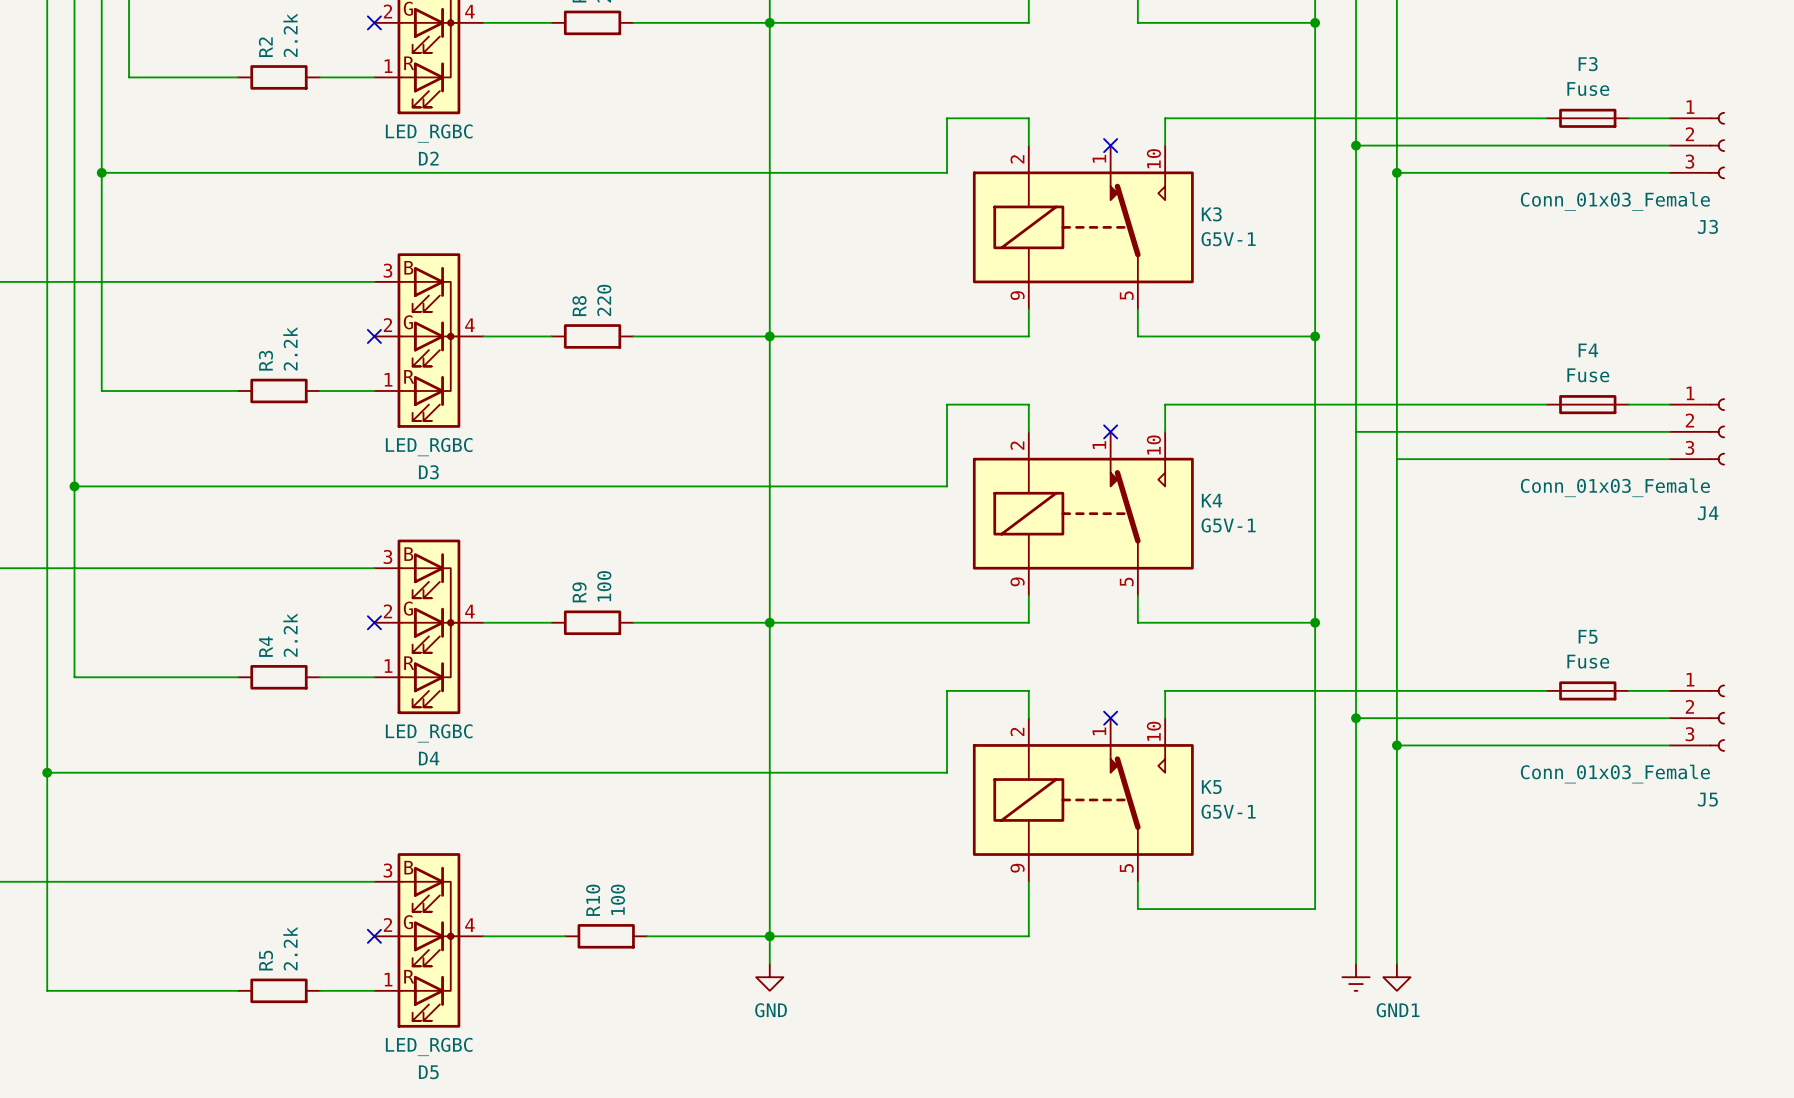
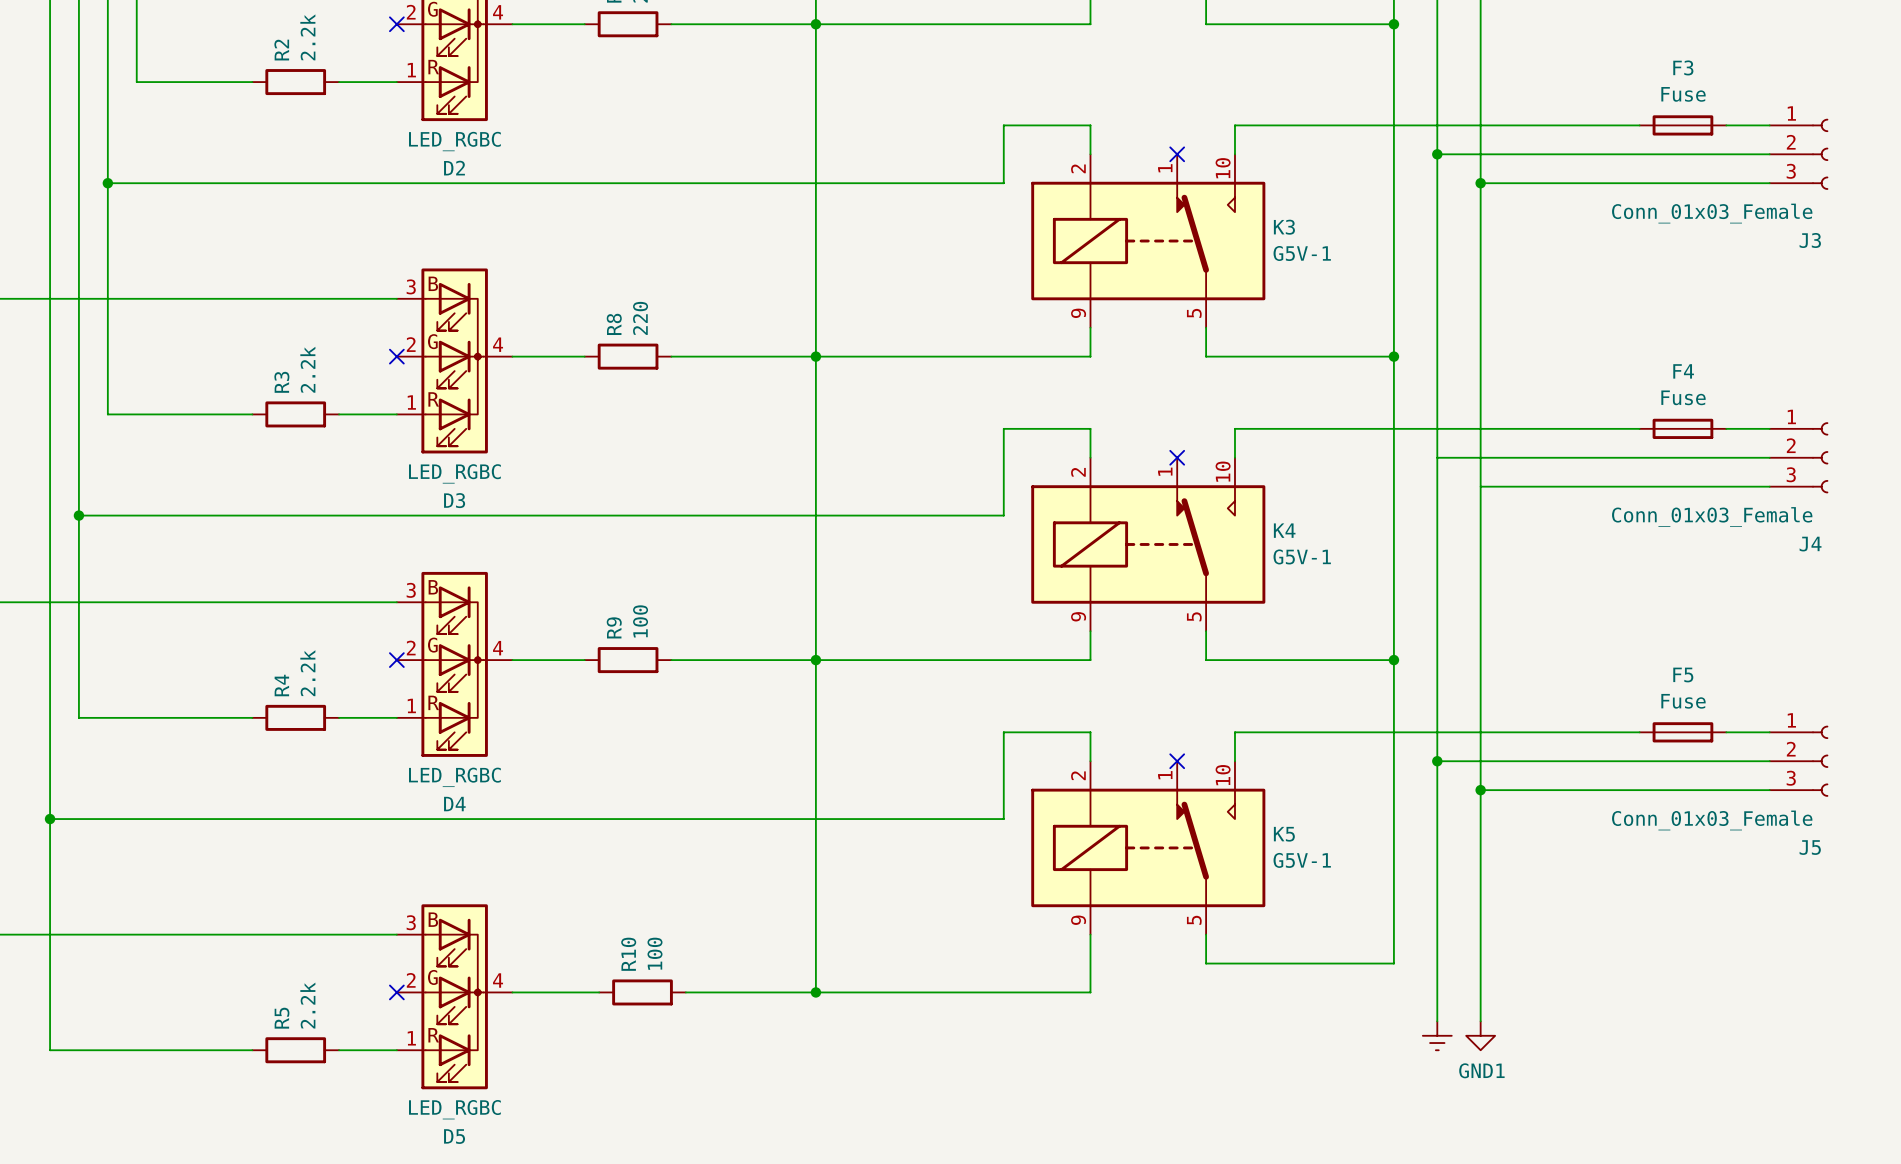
wire: (769, 936) (769, 963) -> none
power symbol: GND (769, 977) -> none

